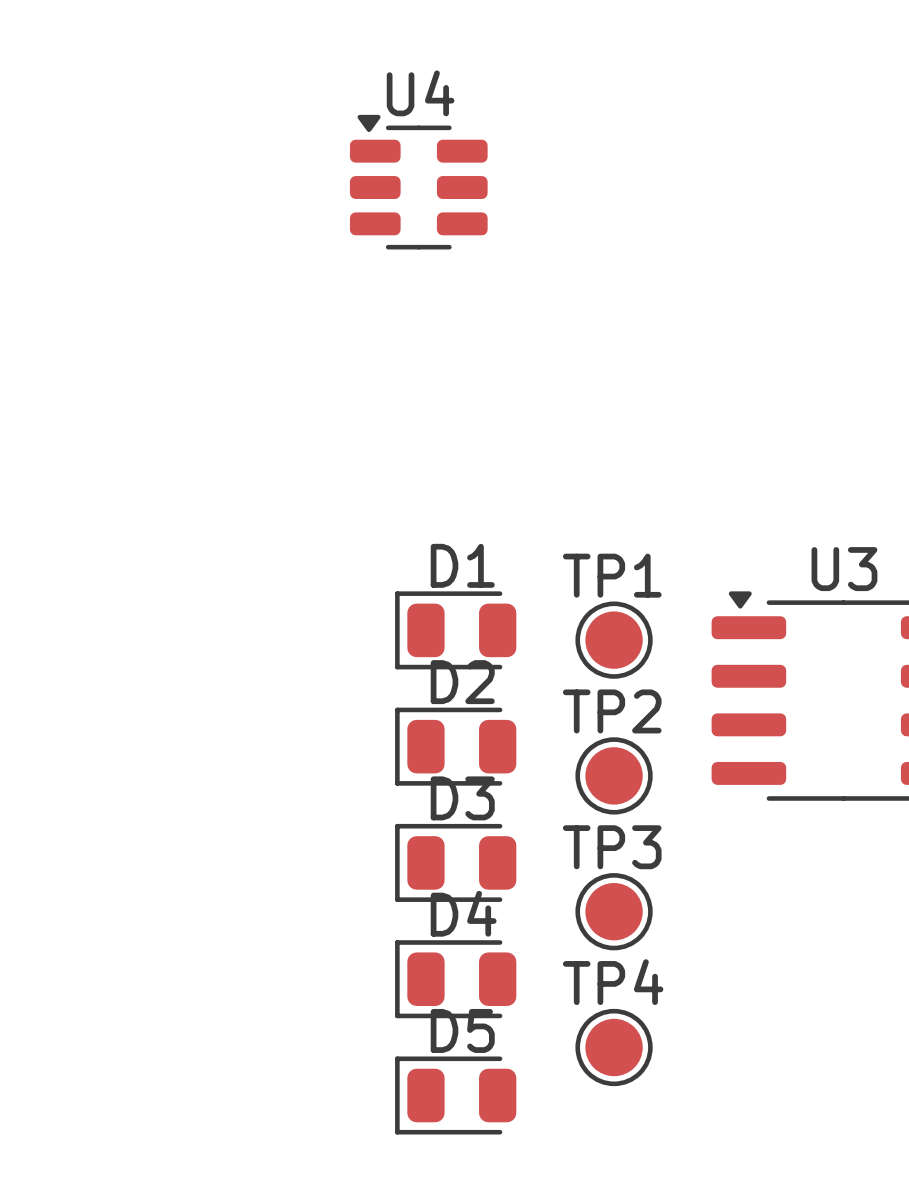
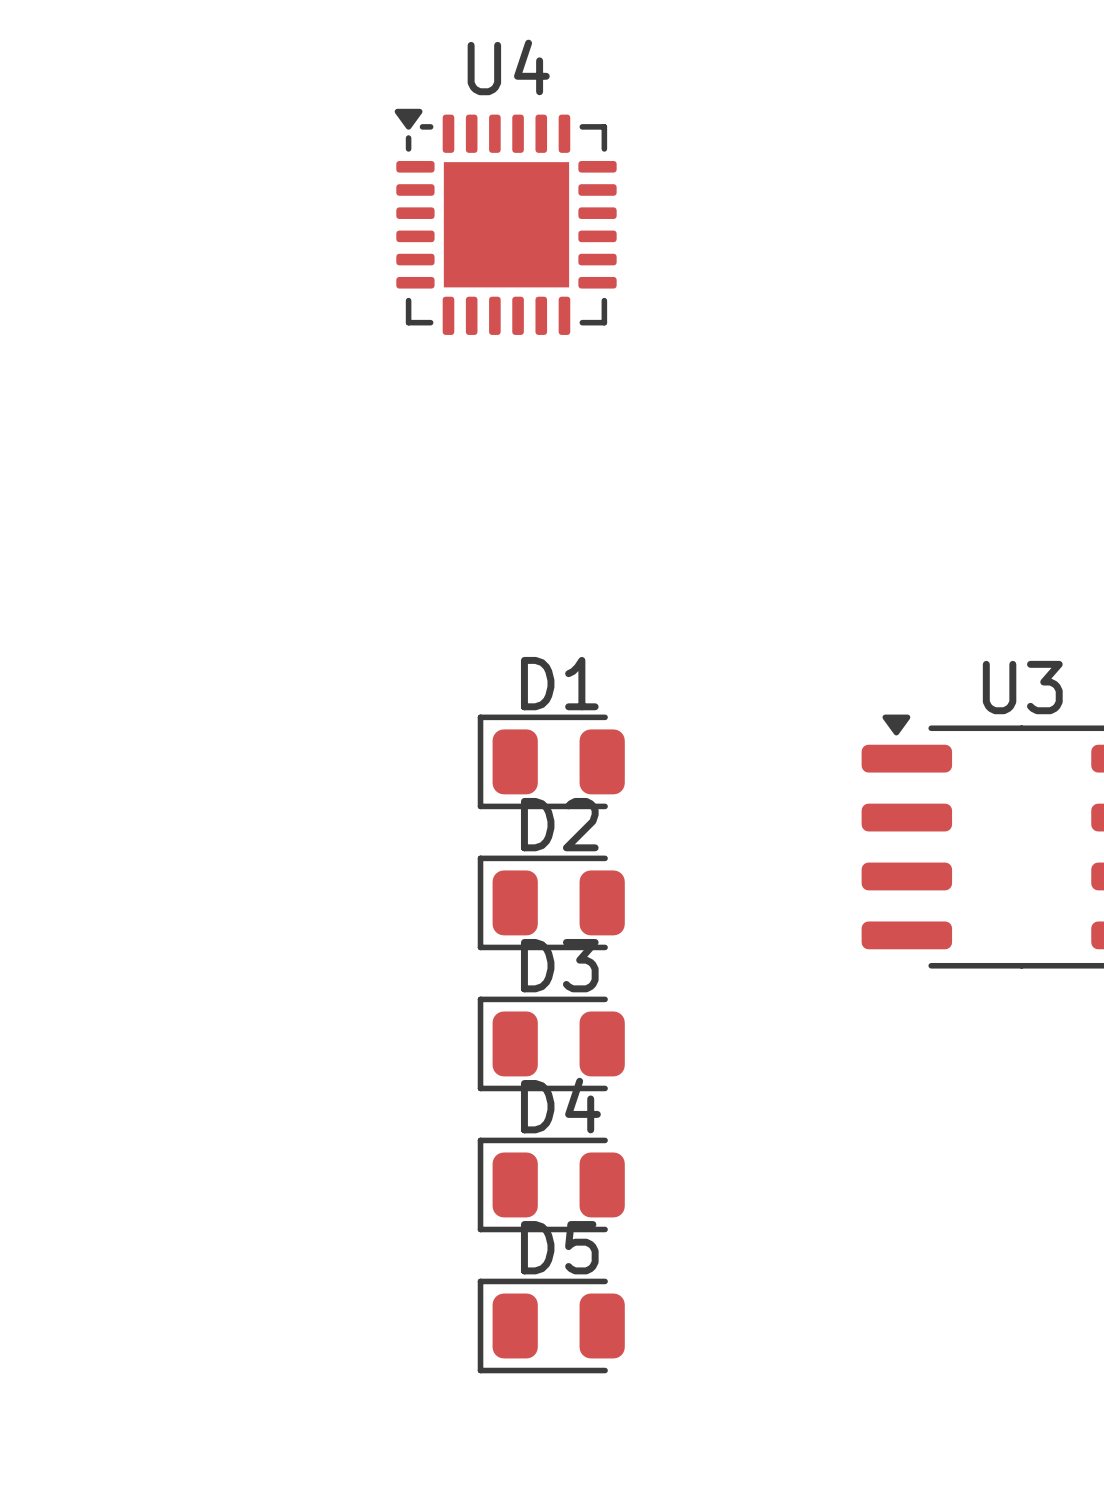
U4 footprint: [349, 114, 488, 250] -> [394, 108, 617, 335]
TP1: (614, 640) -> none
TP2: (614, 775) -> none
TP3: (614, 911) -> none
TP4: (614, 1047) -> none

